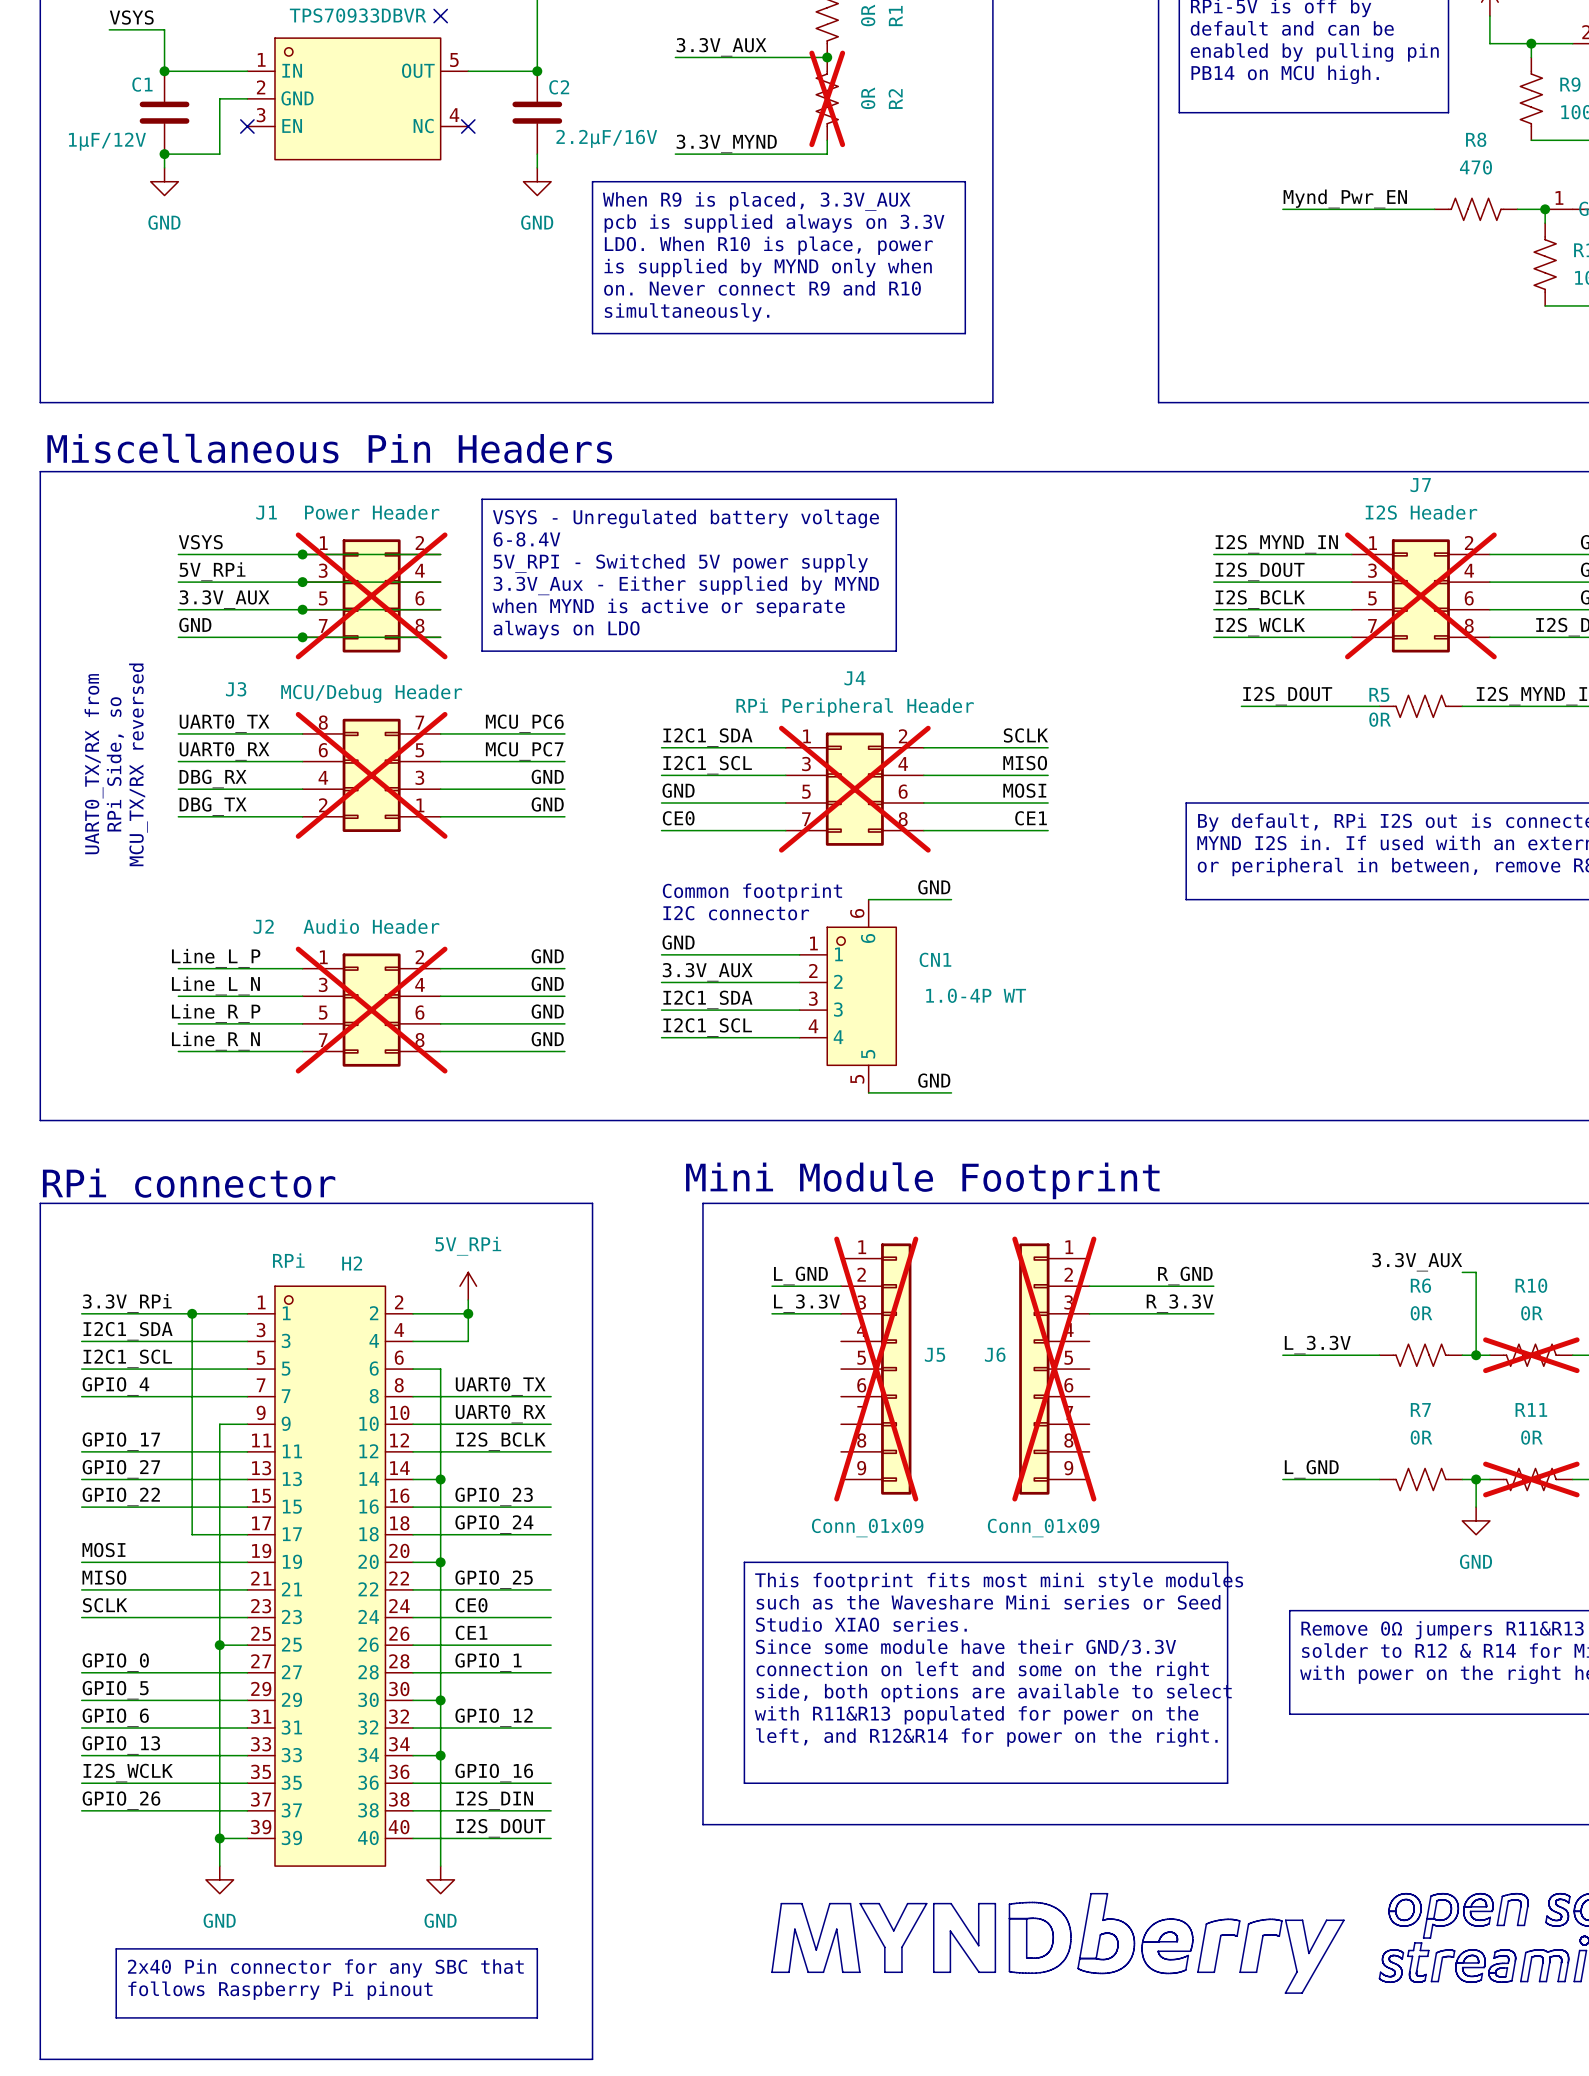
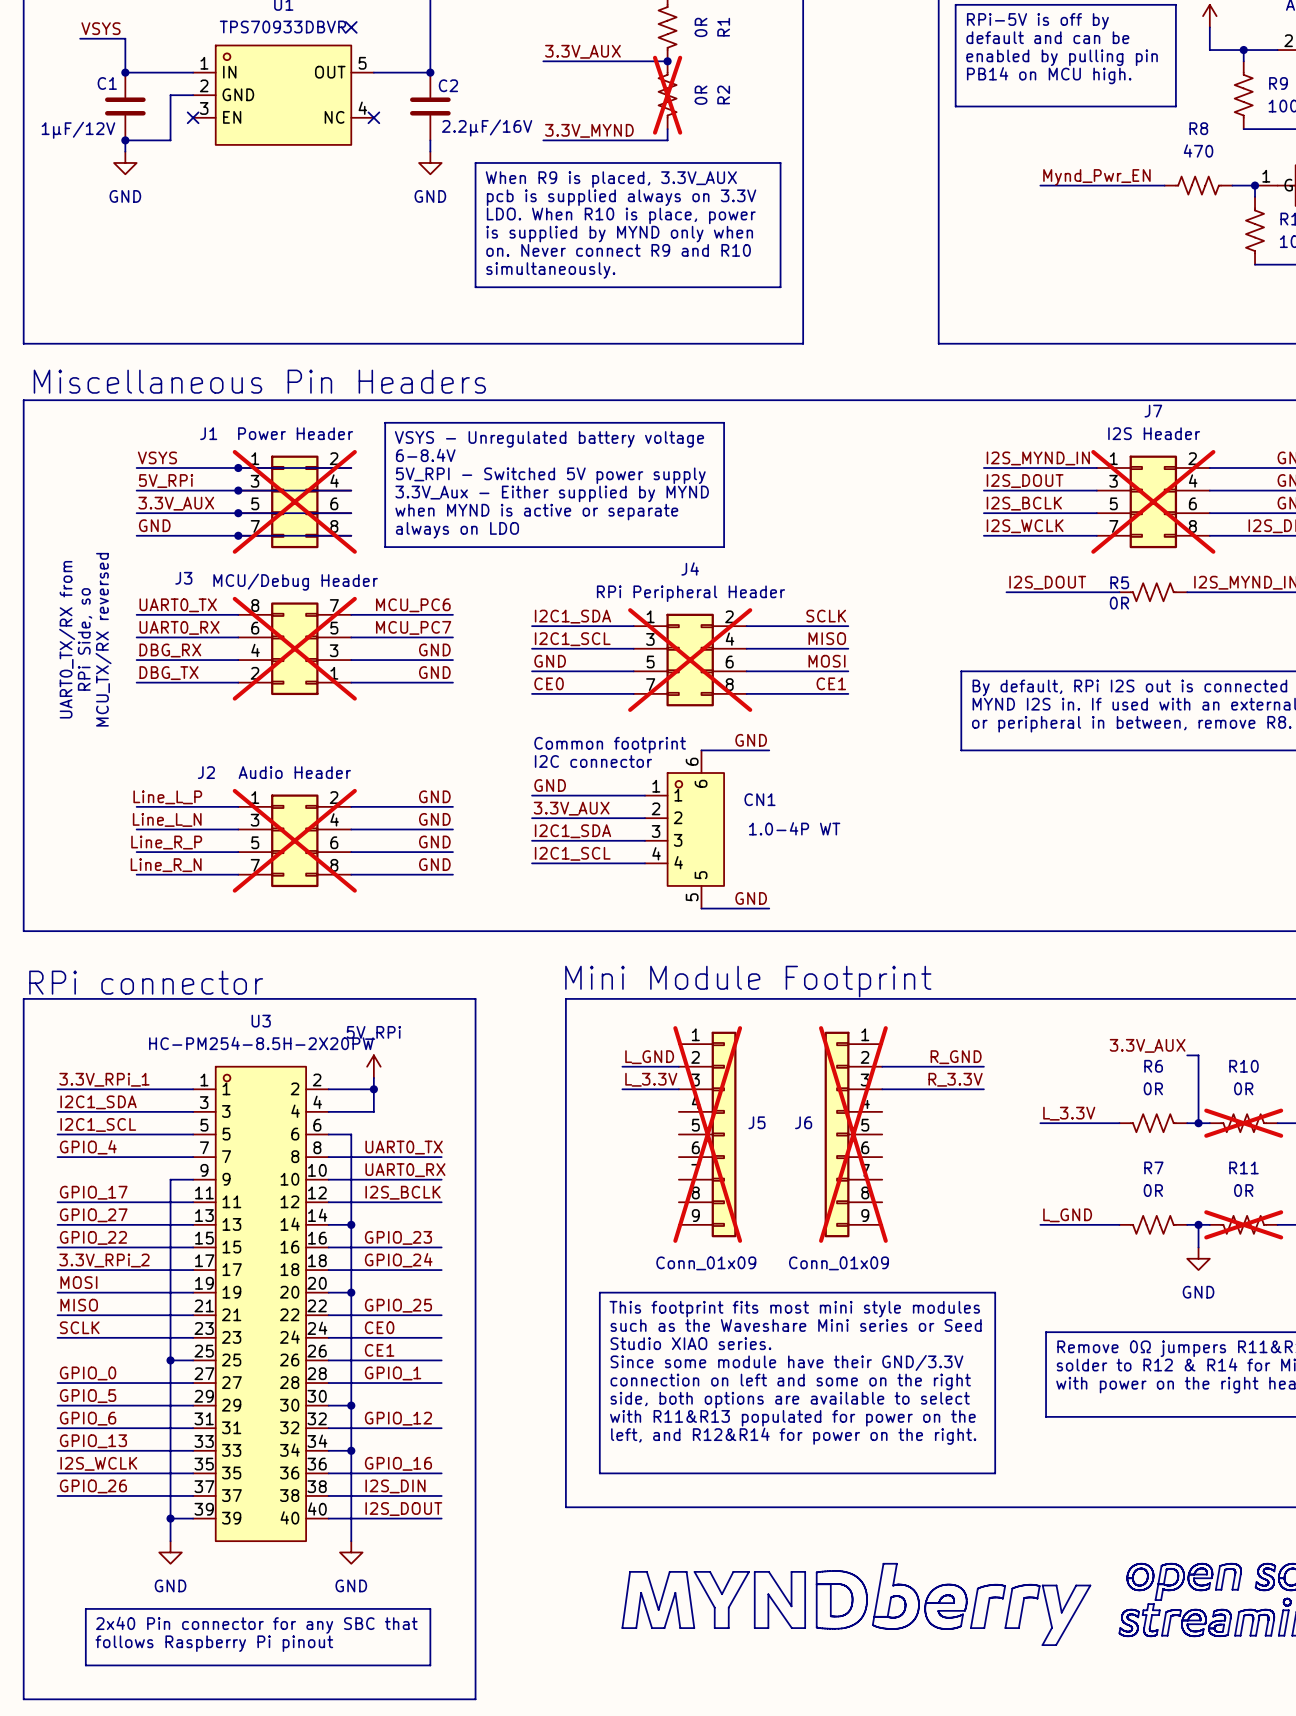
H2 value: RPi (288, 1260) -> HC-PM254-8.5H-2X20PW (261, 1043)
H2 name: H2 (352, 1263) -> U3 (261, 1021)
label: 3.3V_RPi (127, 1303) -> 3.3V_RPi_1 (104, 1079)
wire: (192, 1313) (192, 1534) -> (57, 1270) (147, 1270)
junction: (192, 1313) -> none
label: none -> 3.3V_RPi_2 (104, 1260)

